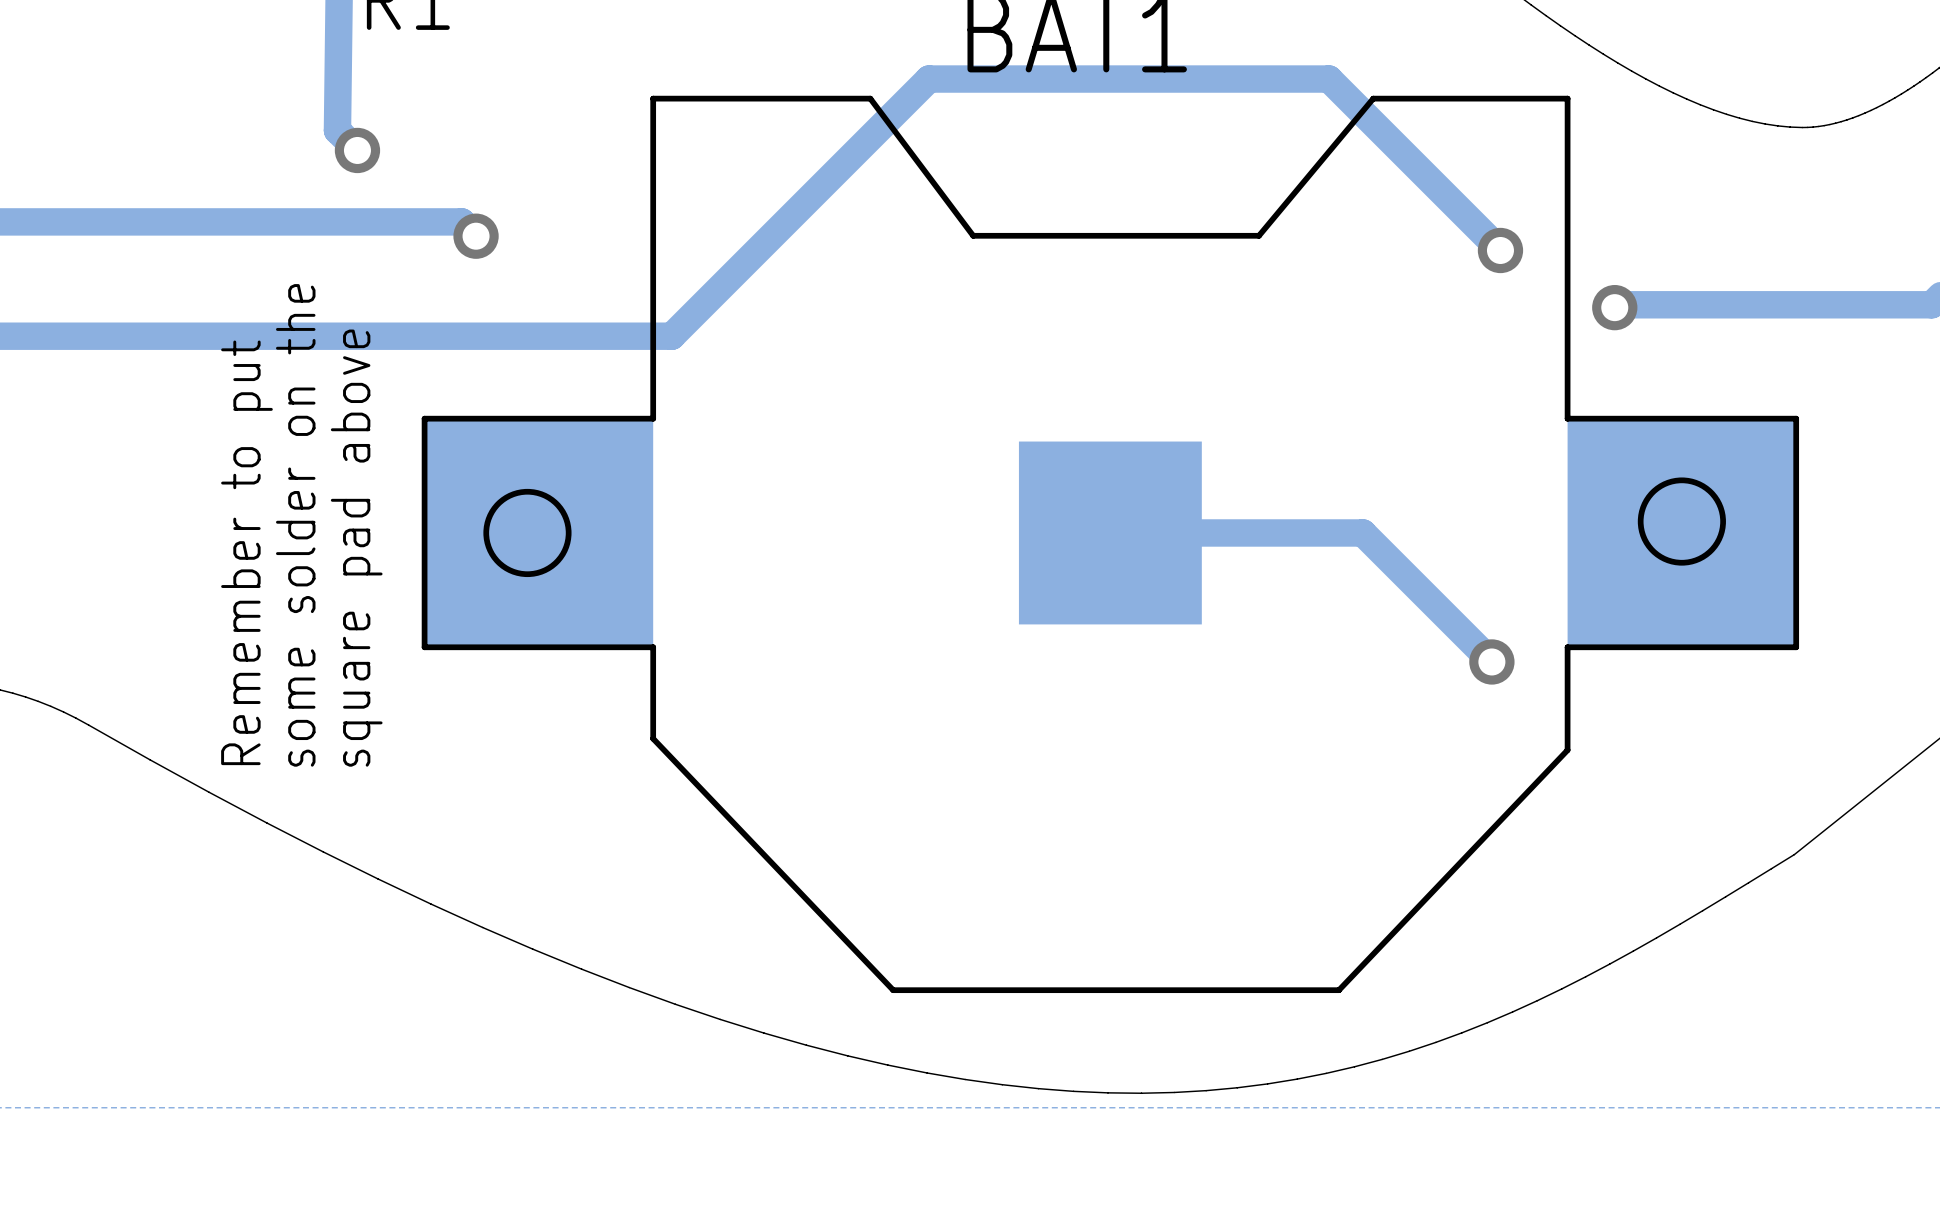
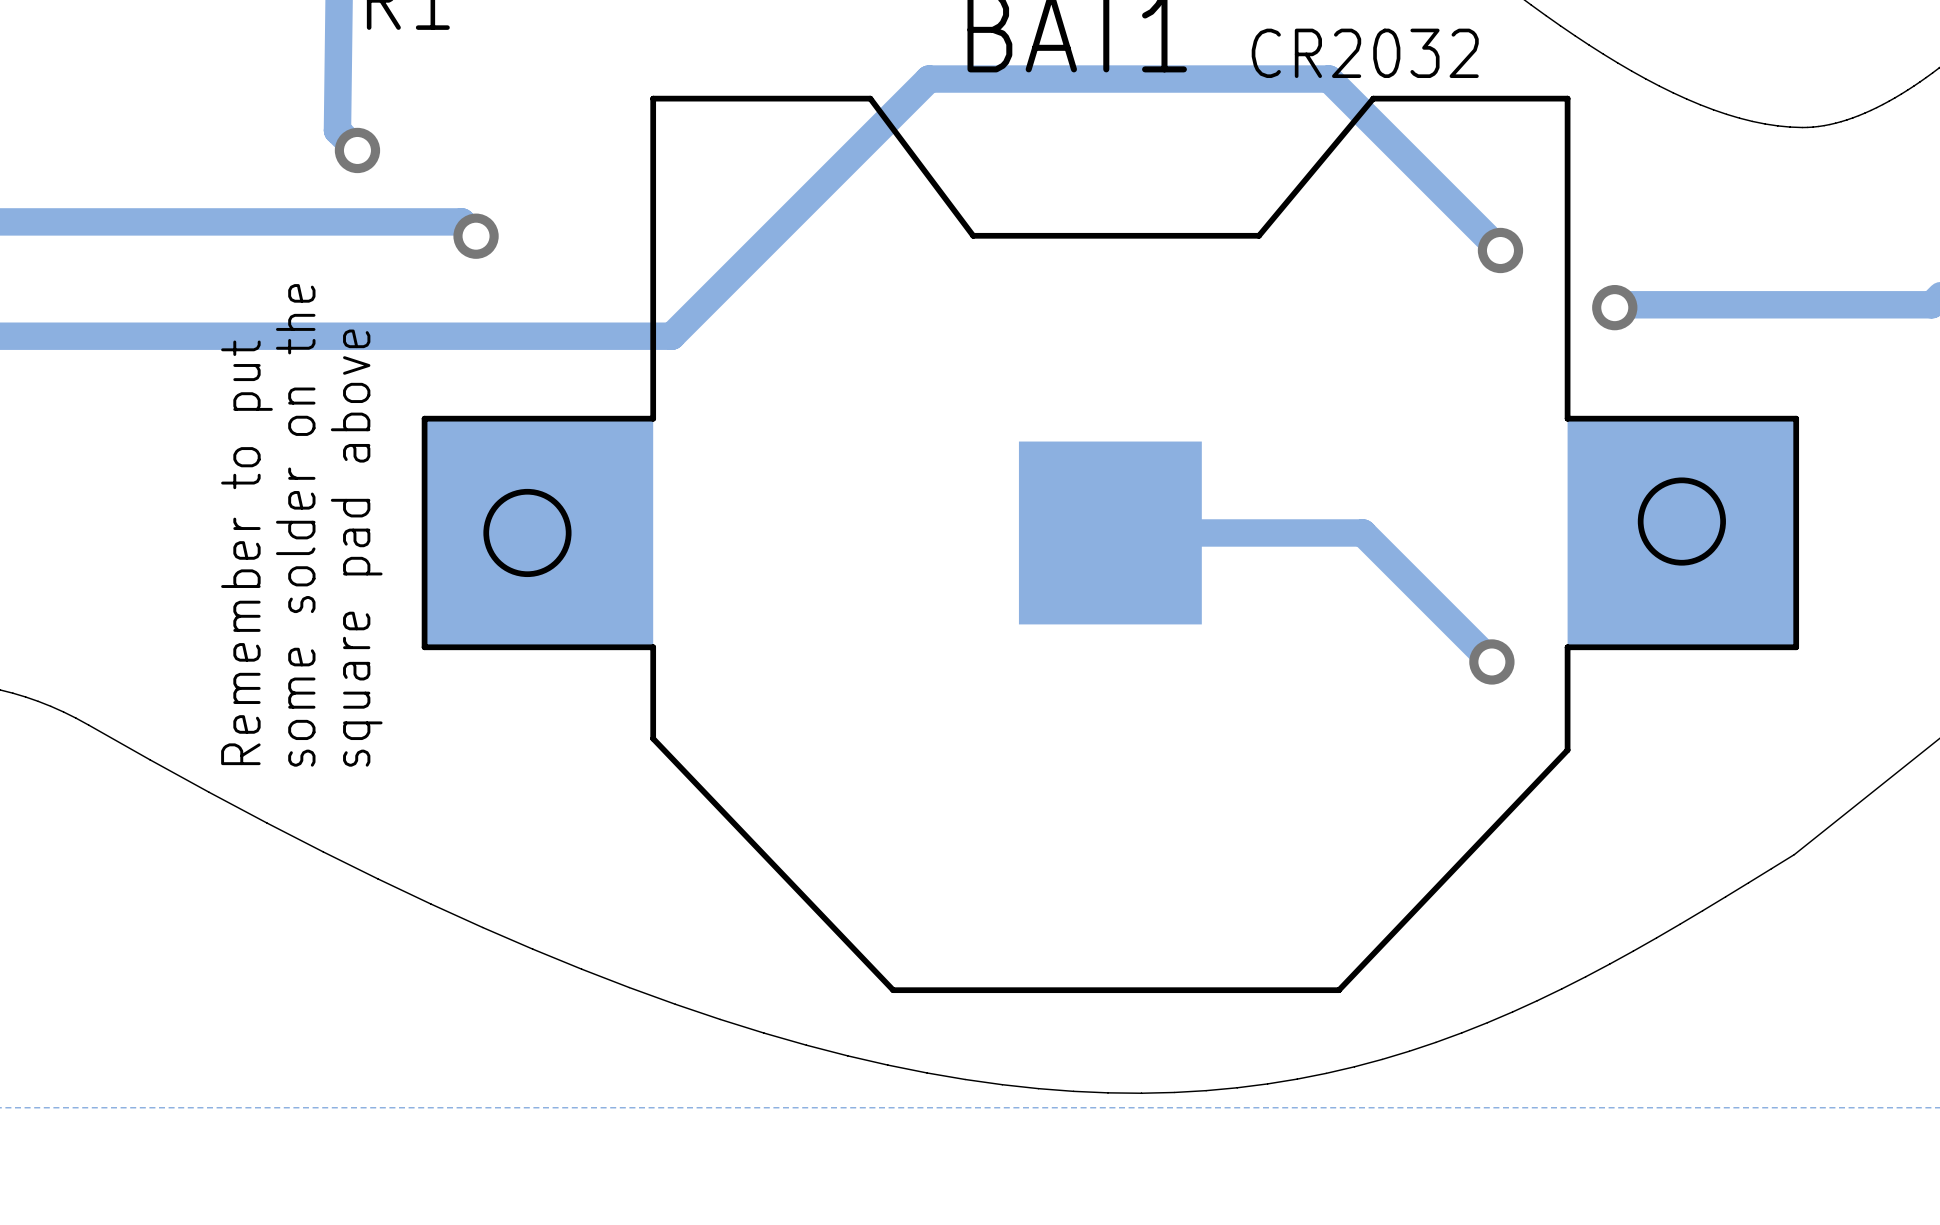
text: none -> CR2032 (1365, 53)

